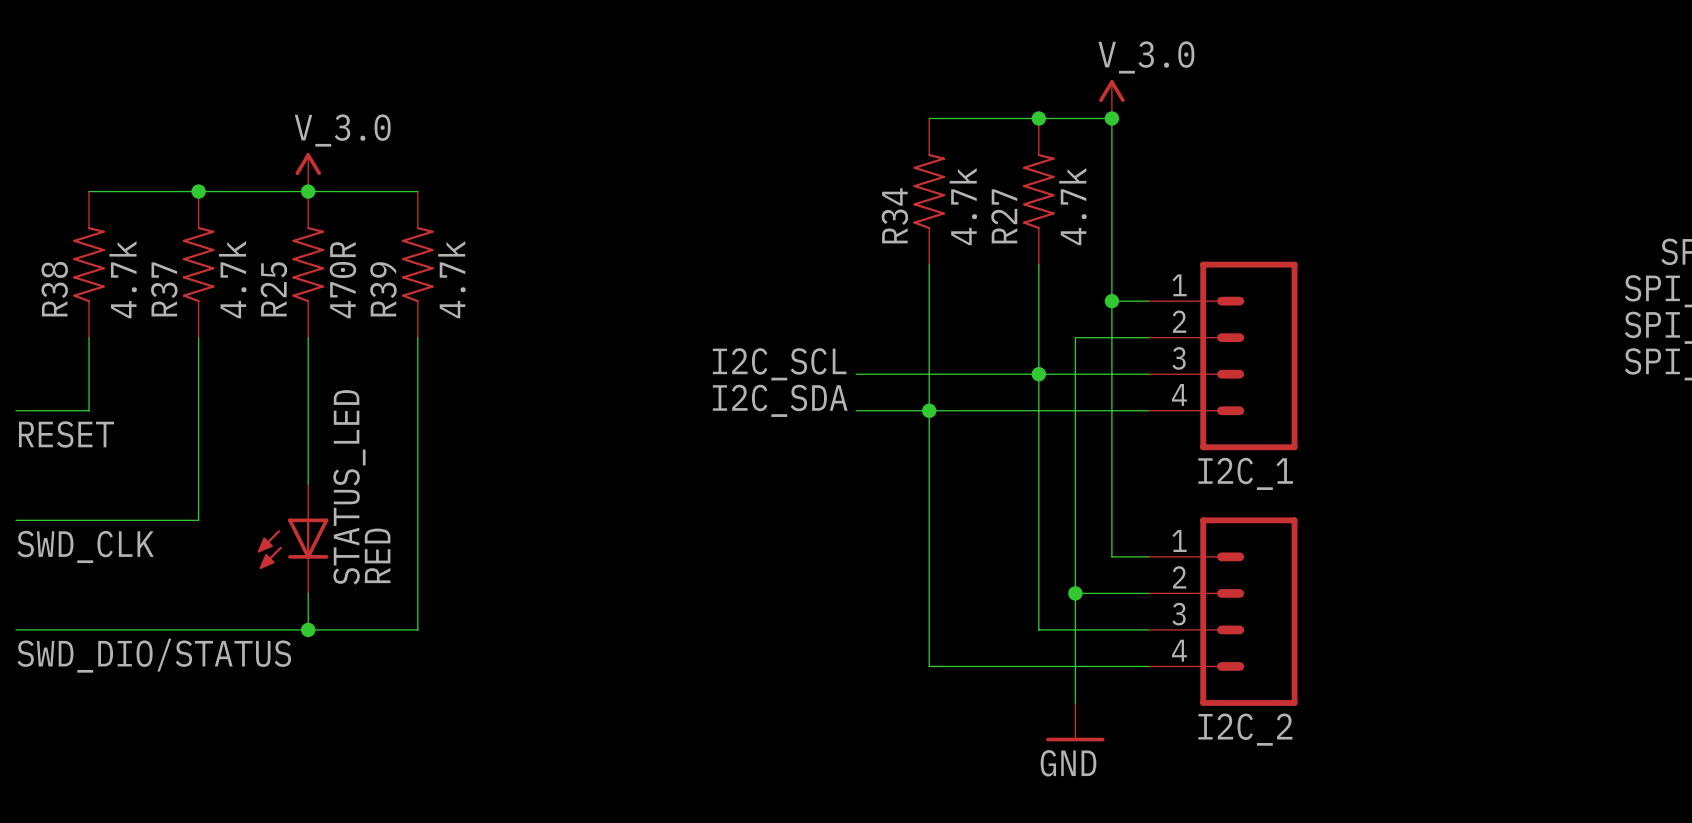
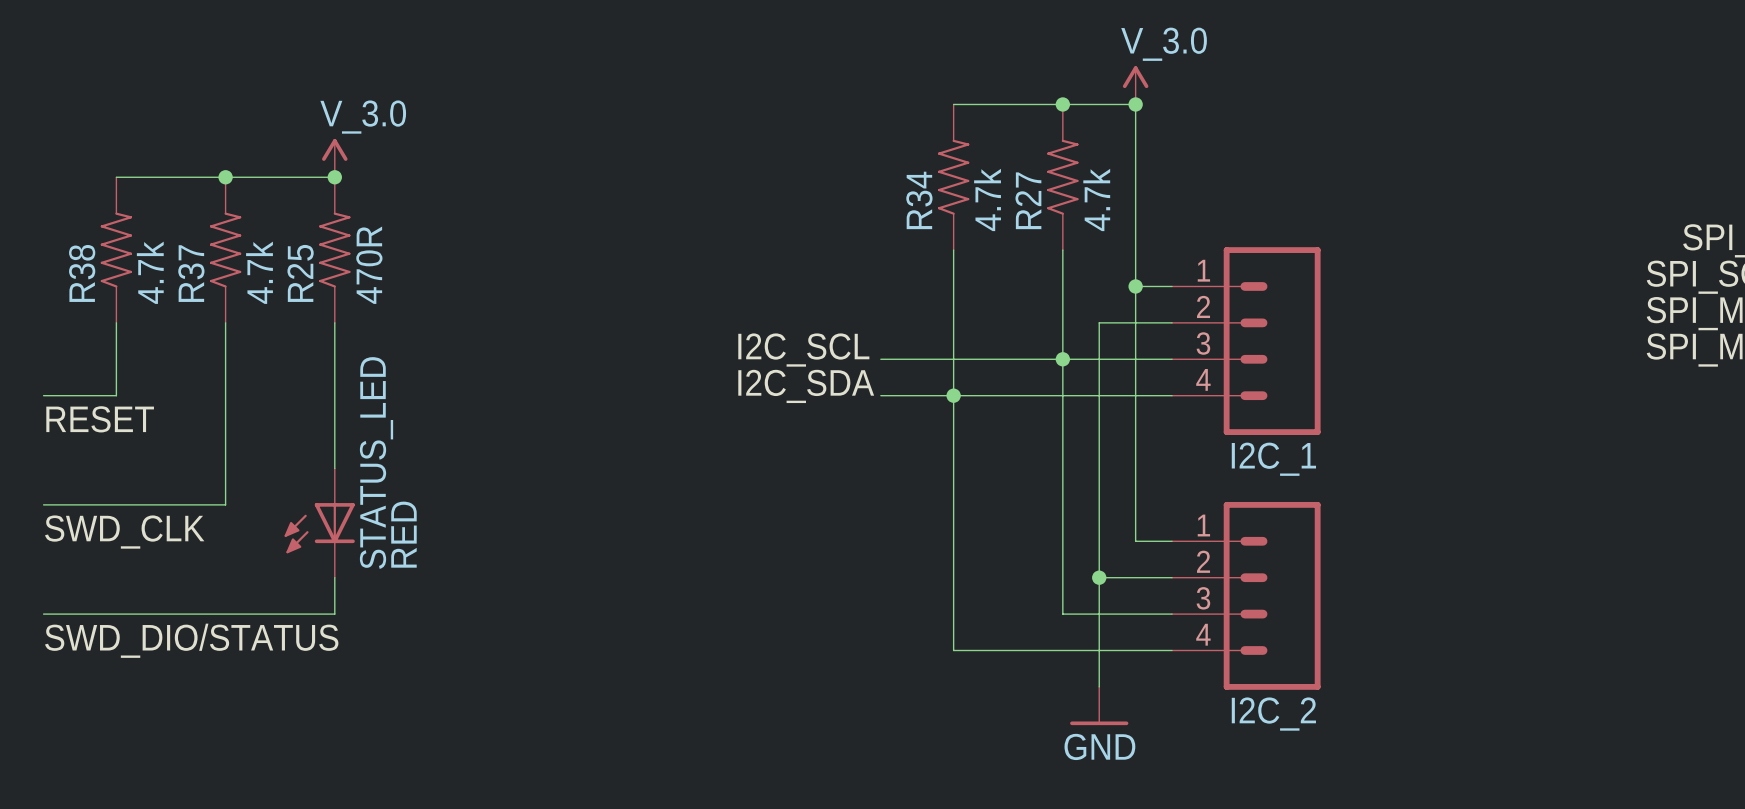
wire: (308, 191) (417, 191) -> none
R39: 4.7k (417, 264) -> none
wire: (417, 337) (417, 629) (308, 629) -> none
junction: (308, 629) -> none

